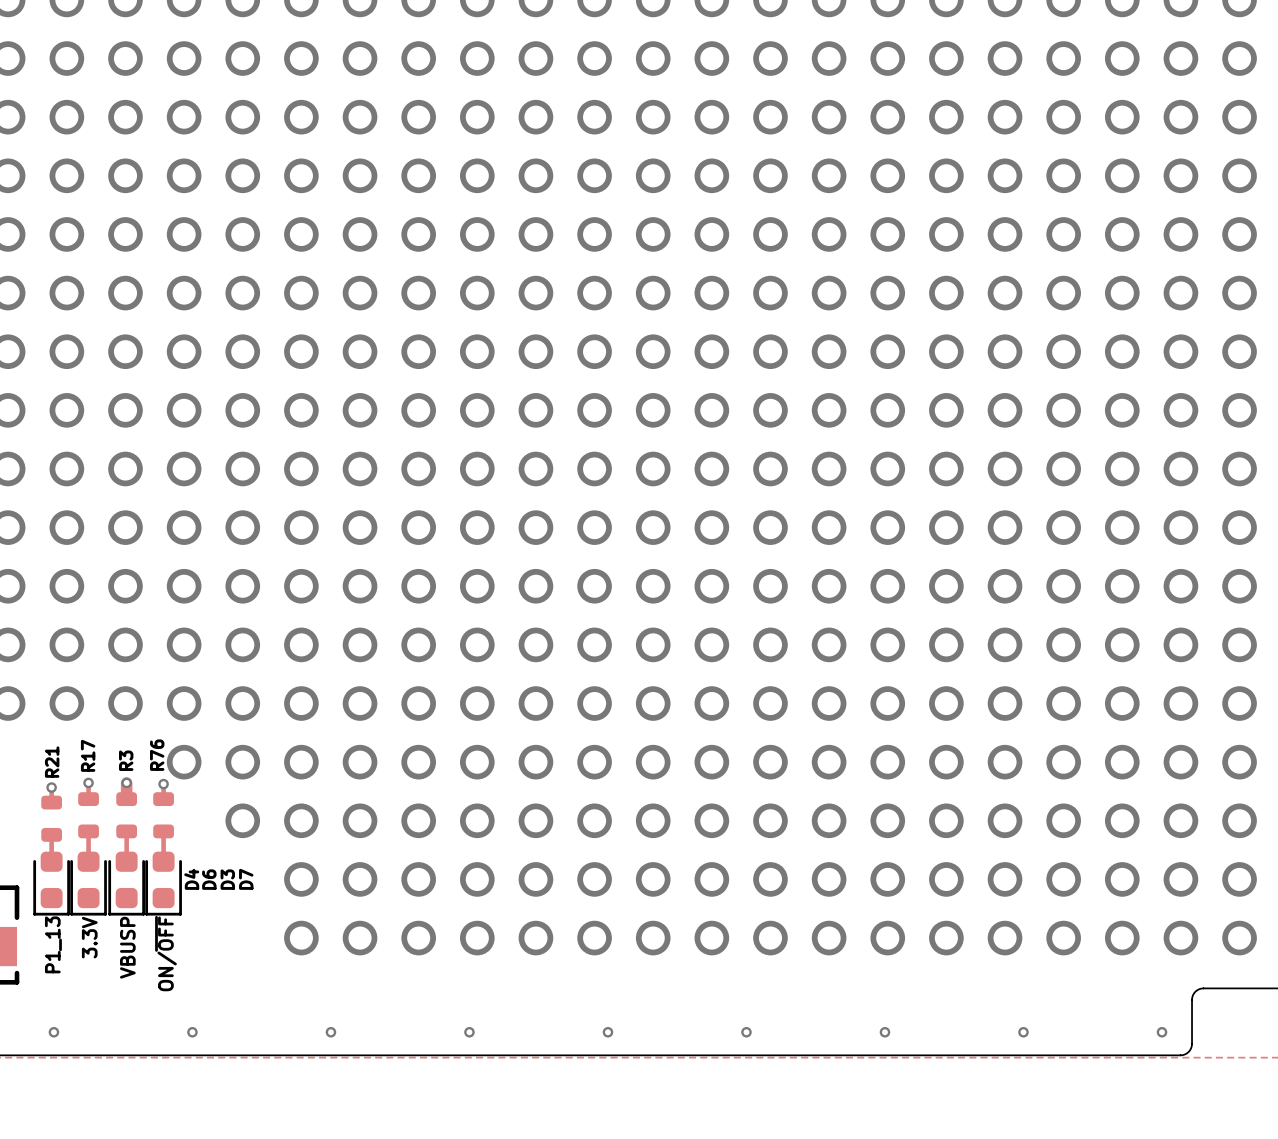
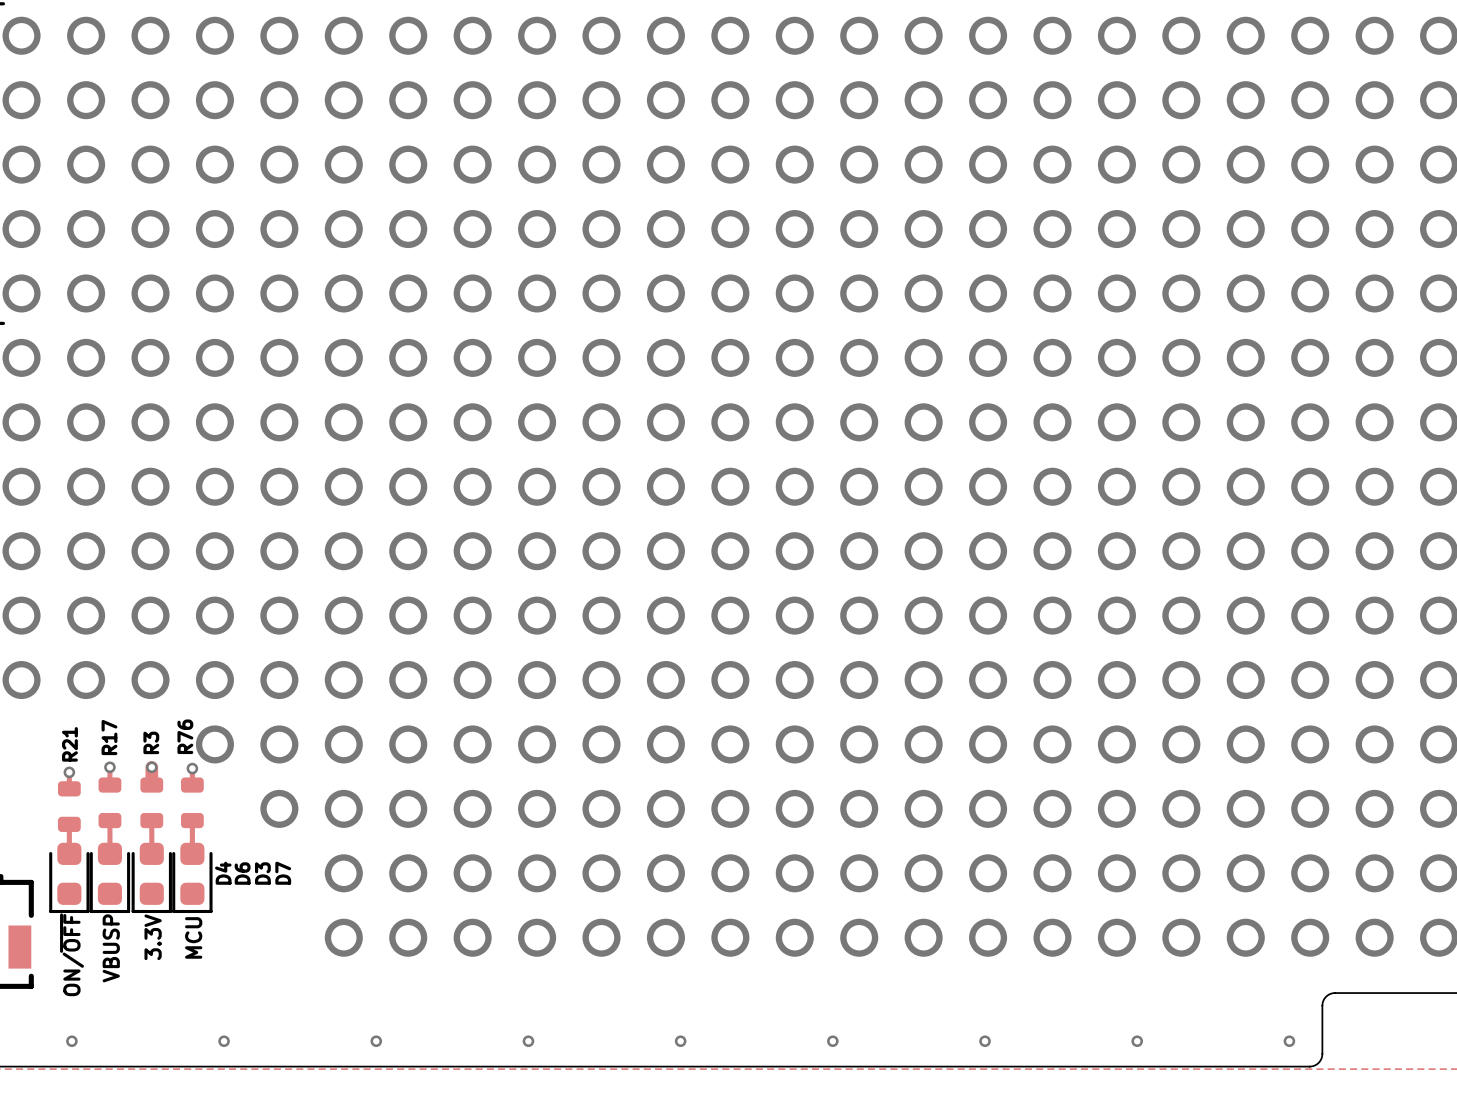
text position: 3.3V (89, 937) -> 3.3V (153, 937)
text: none -> MCU (193, 937)
text: P1_13 (53, 944) -> none
text position: VBUSP (127, 947) -> VBUSP (111, 948)
text position: ON/~{OFF} (165, 953) -> ON/~{OFF} (71, 954)

